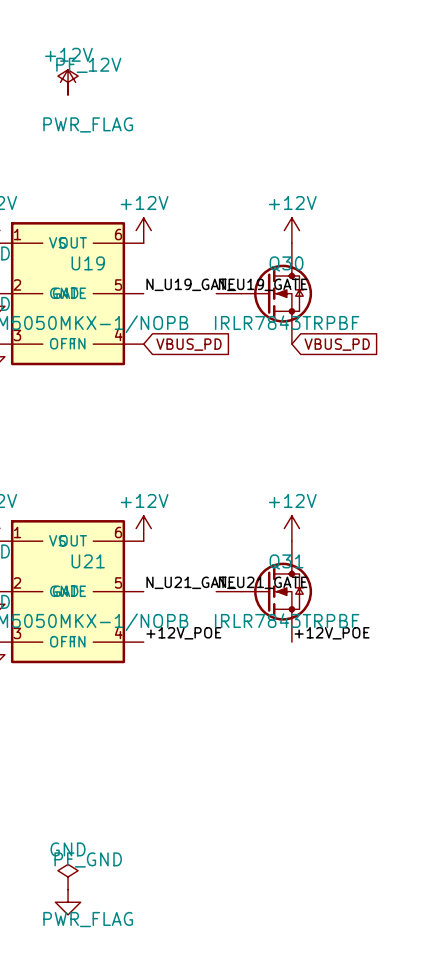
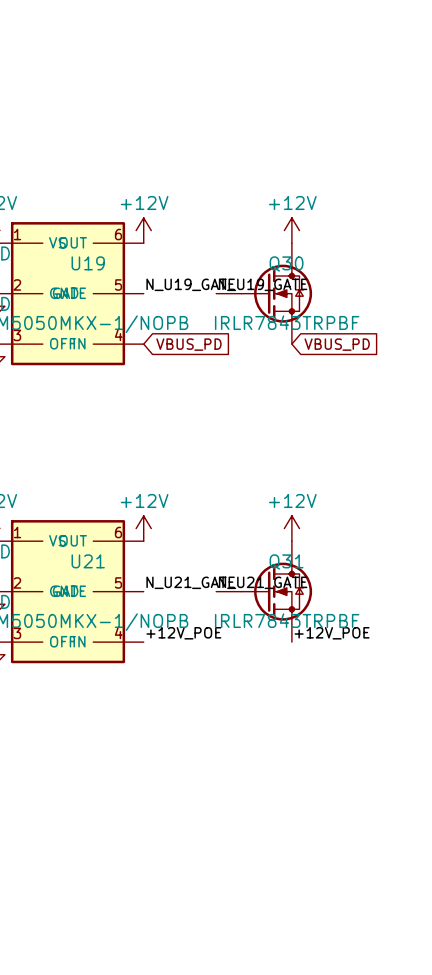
PF_12V: PWR_FLAG (68, 82) -> none
power symbol: +12V (68, 82) -> none
PF_GND: PWR_FLAG (68, 877) -> none
power symbol: GND (68, 902) -> none

